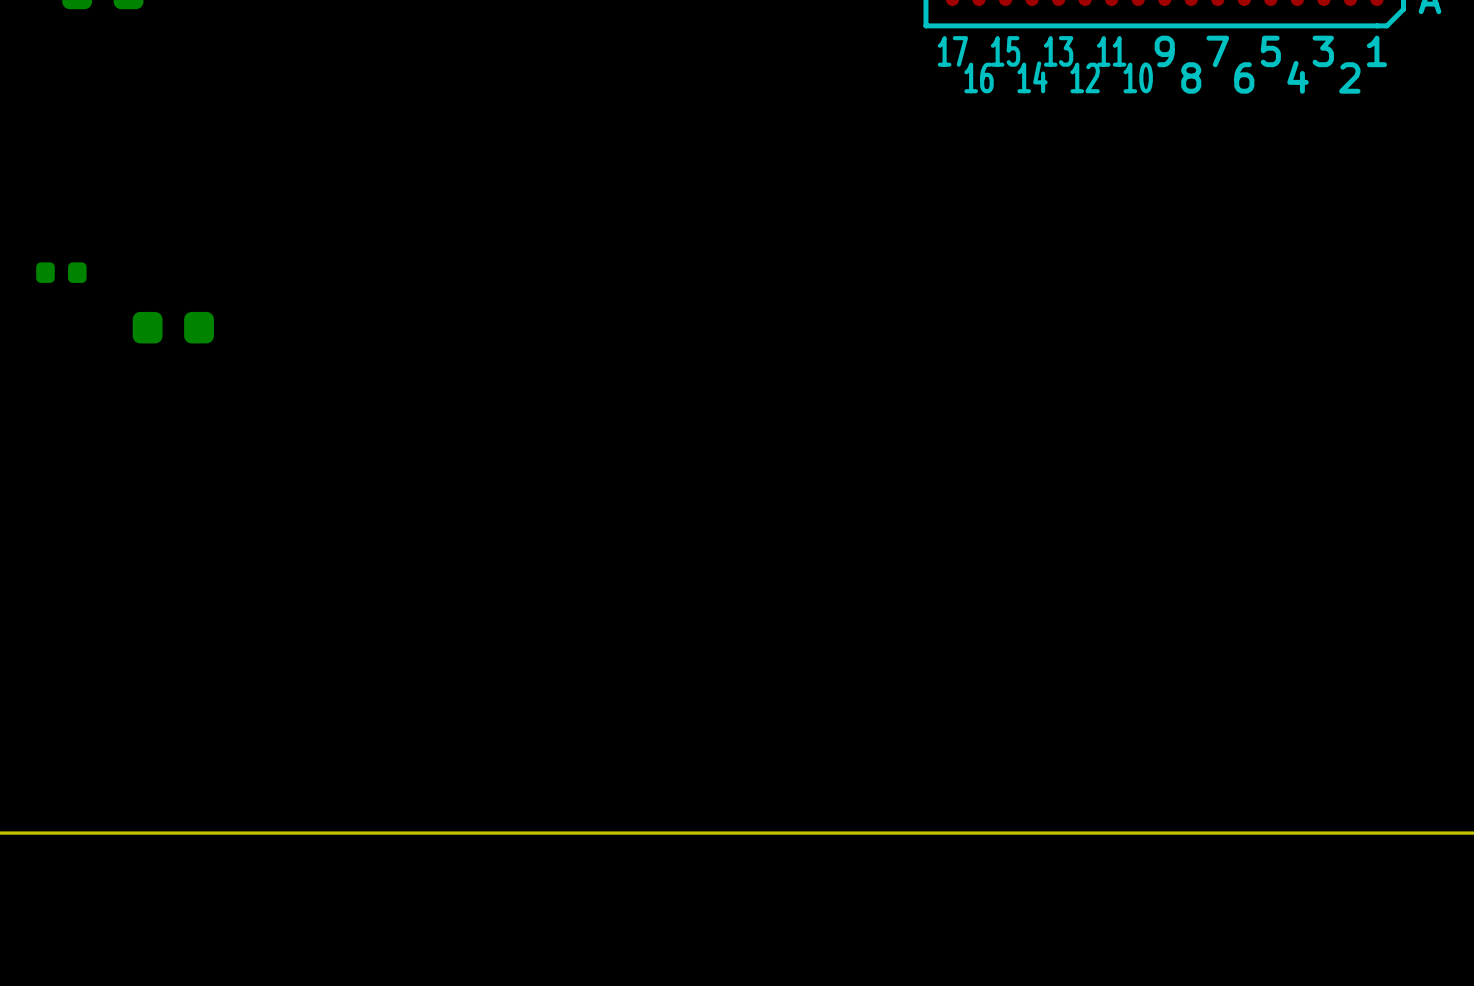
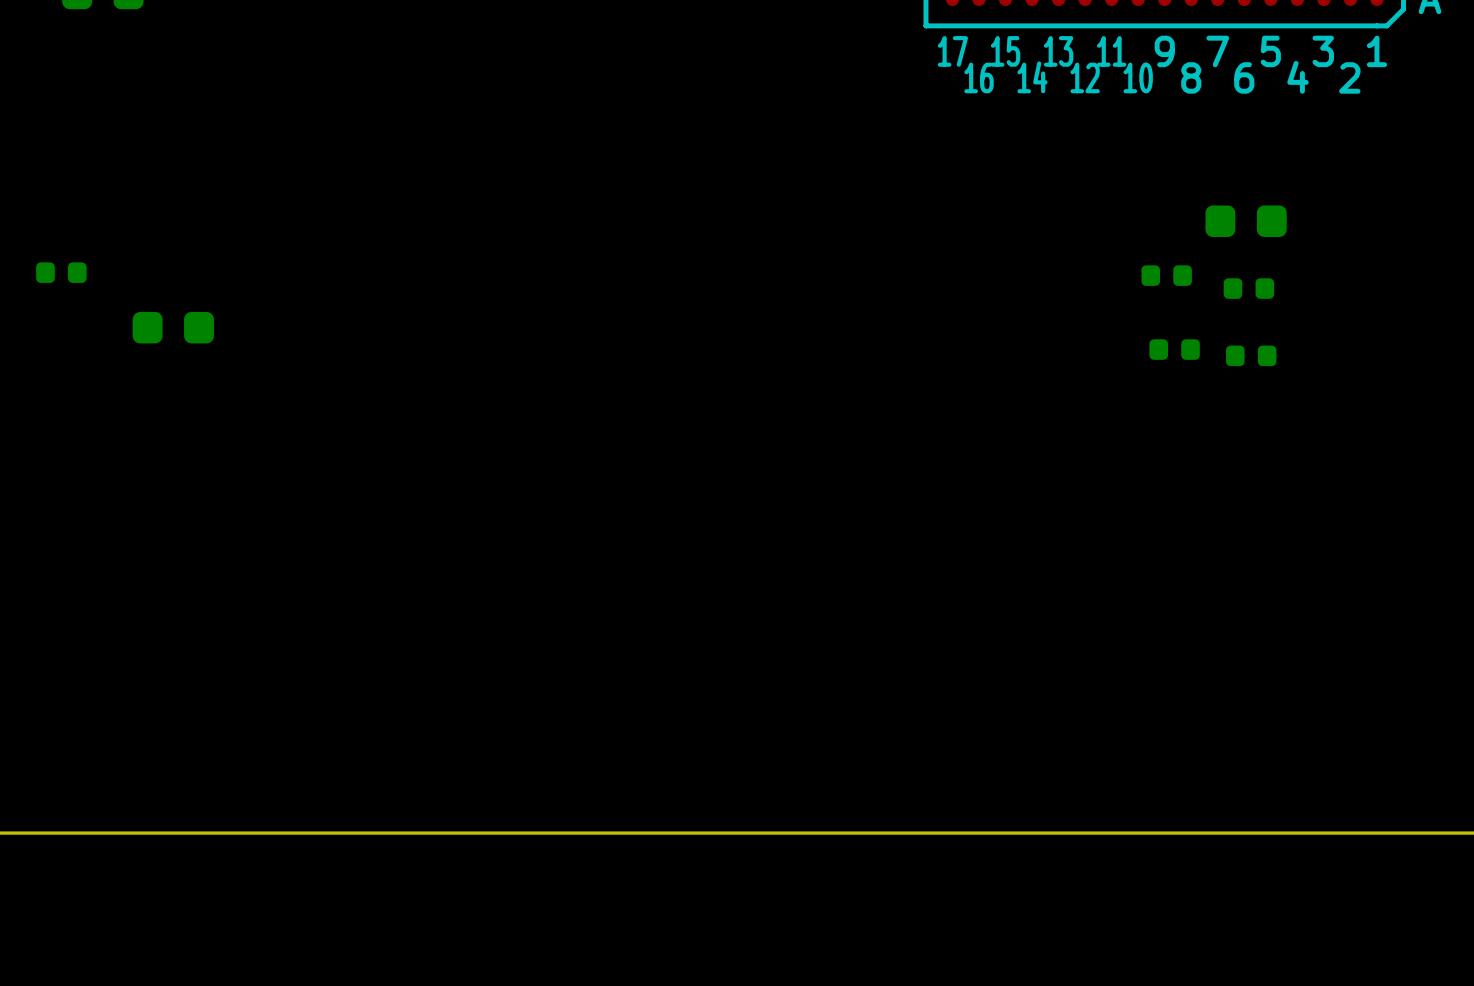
part: none -> (1246, 221)
part: none -> (1166, 275)
part: none -> (1248, 288)
part: none -> (1174, 349)
part: none -> (1251, 355)

